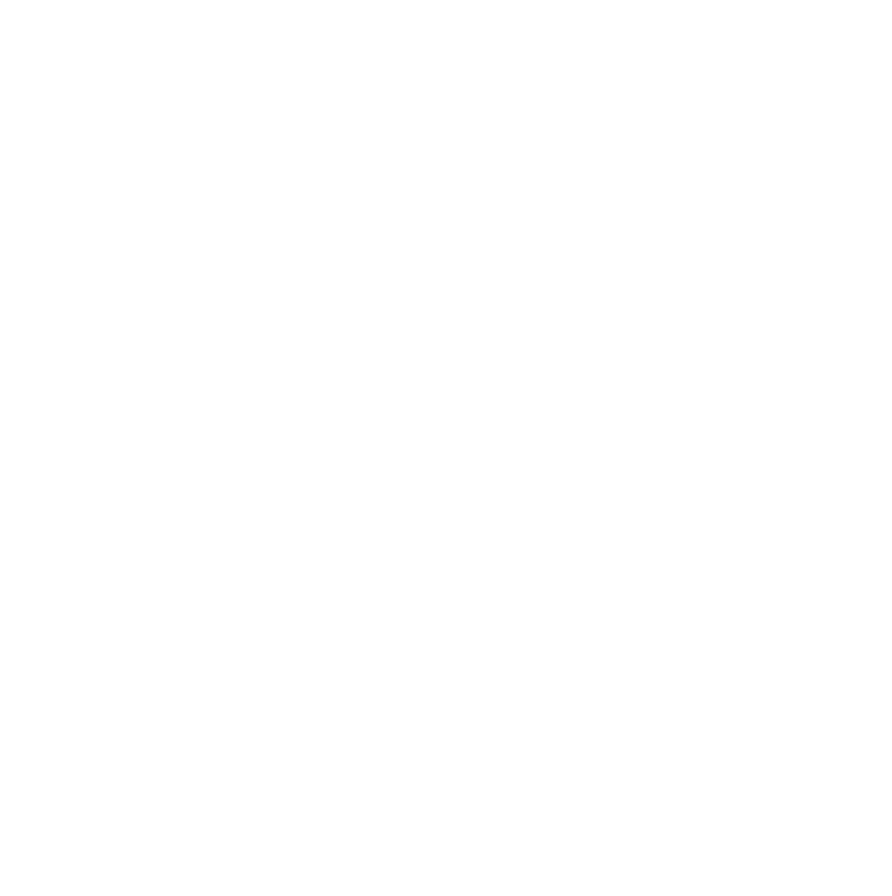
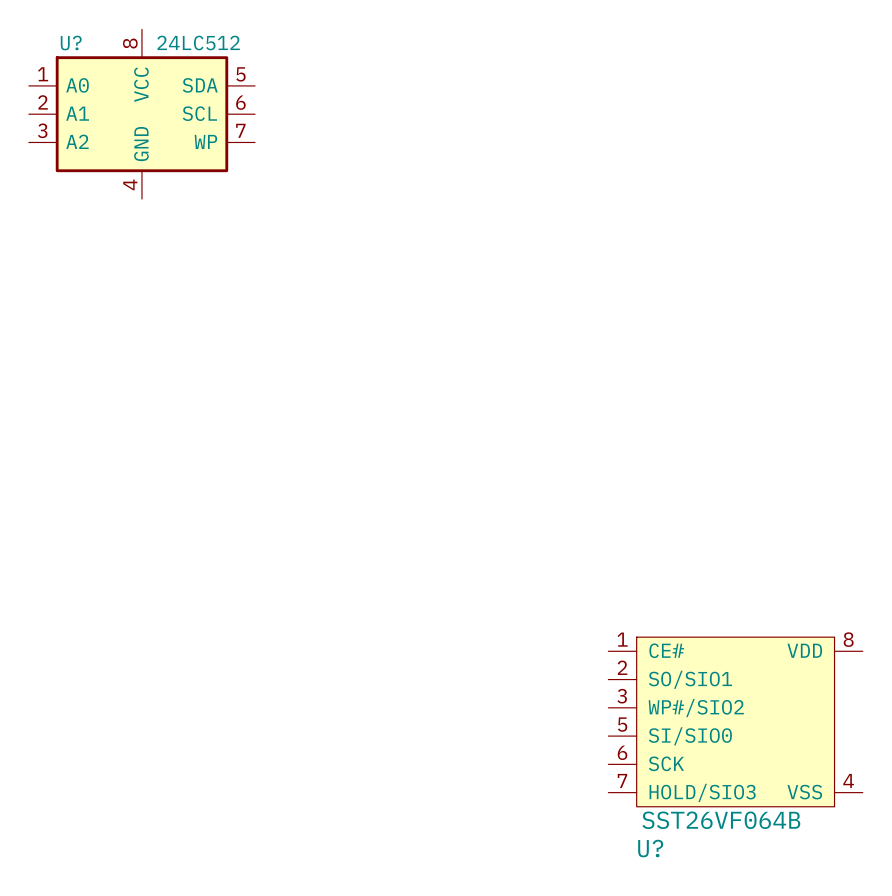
U?: none -> 24LC512 (141, 114)
U?: none -> SST26VF064B (735, 721)

